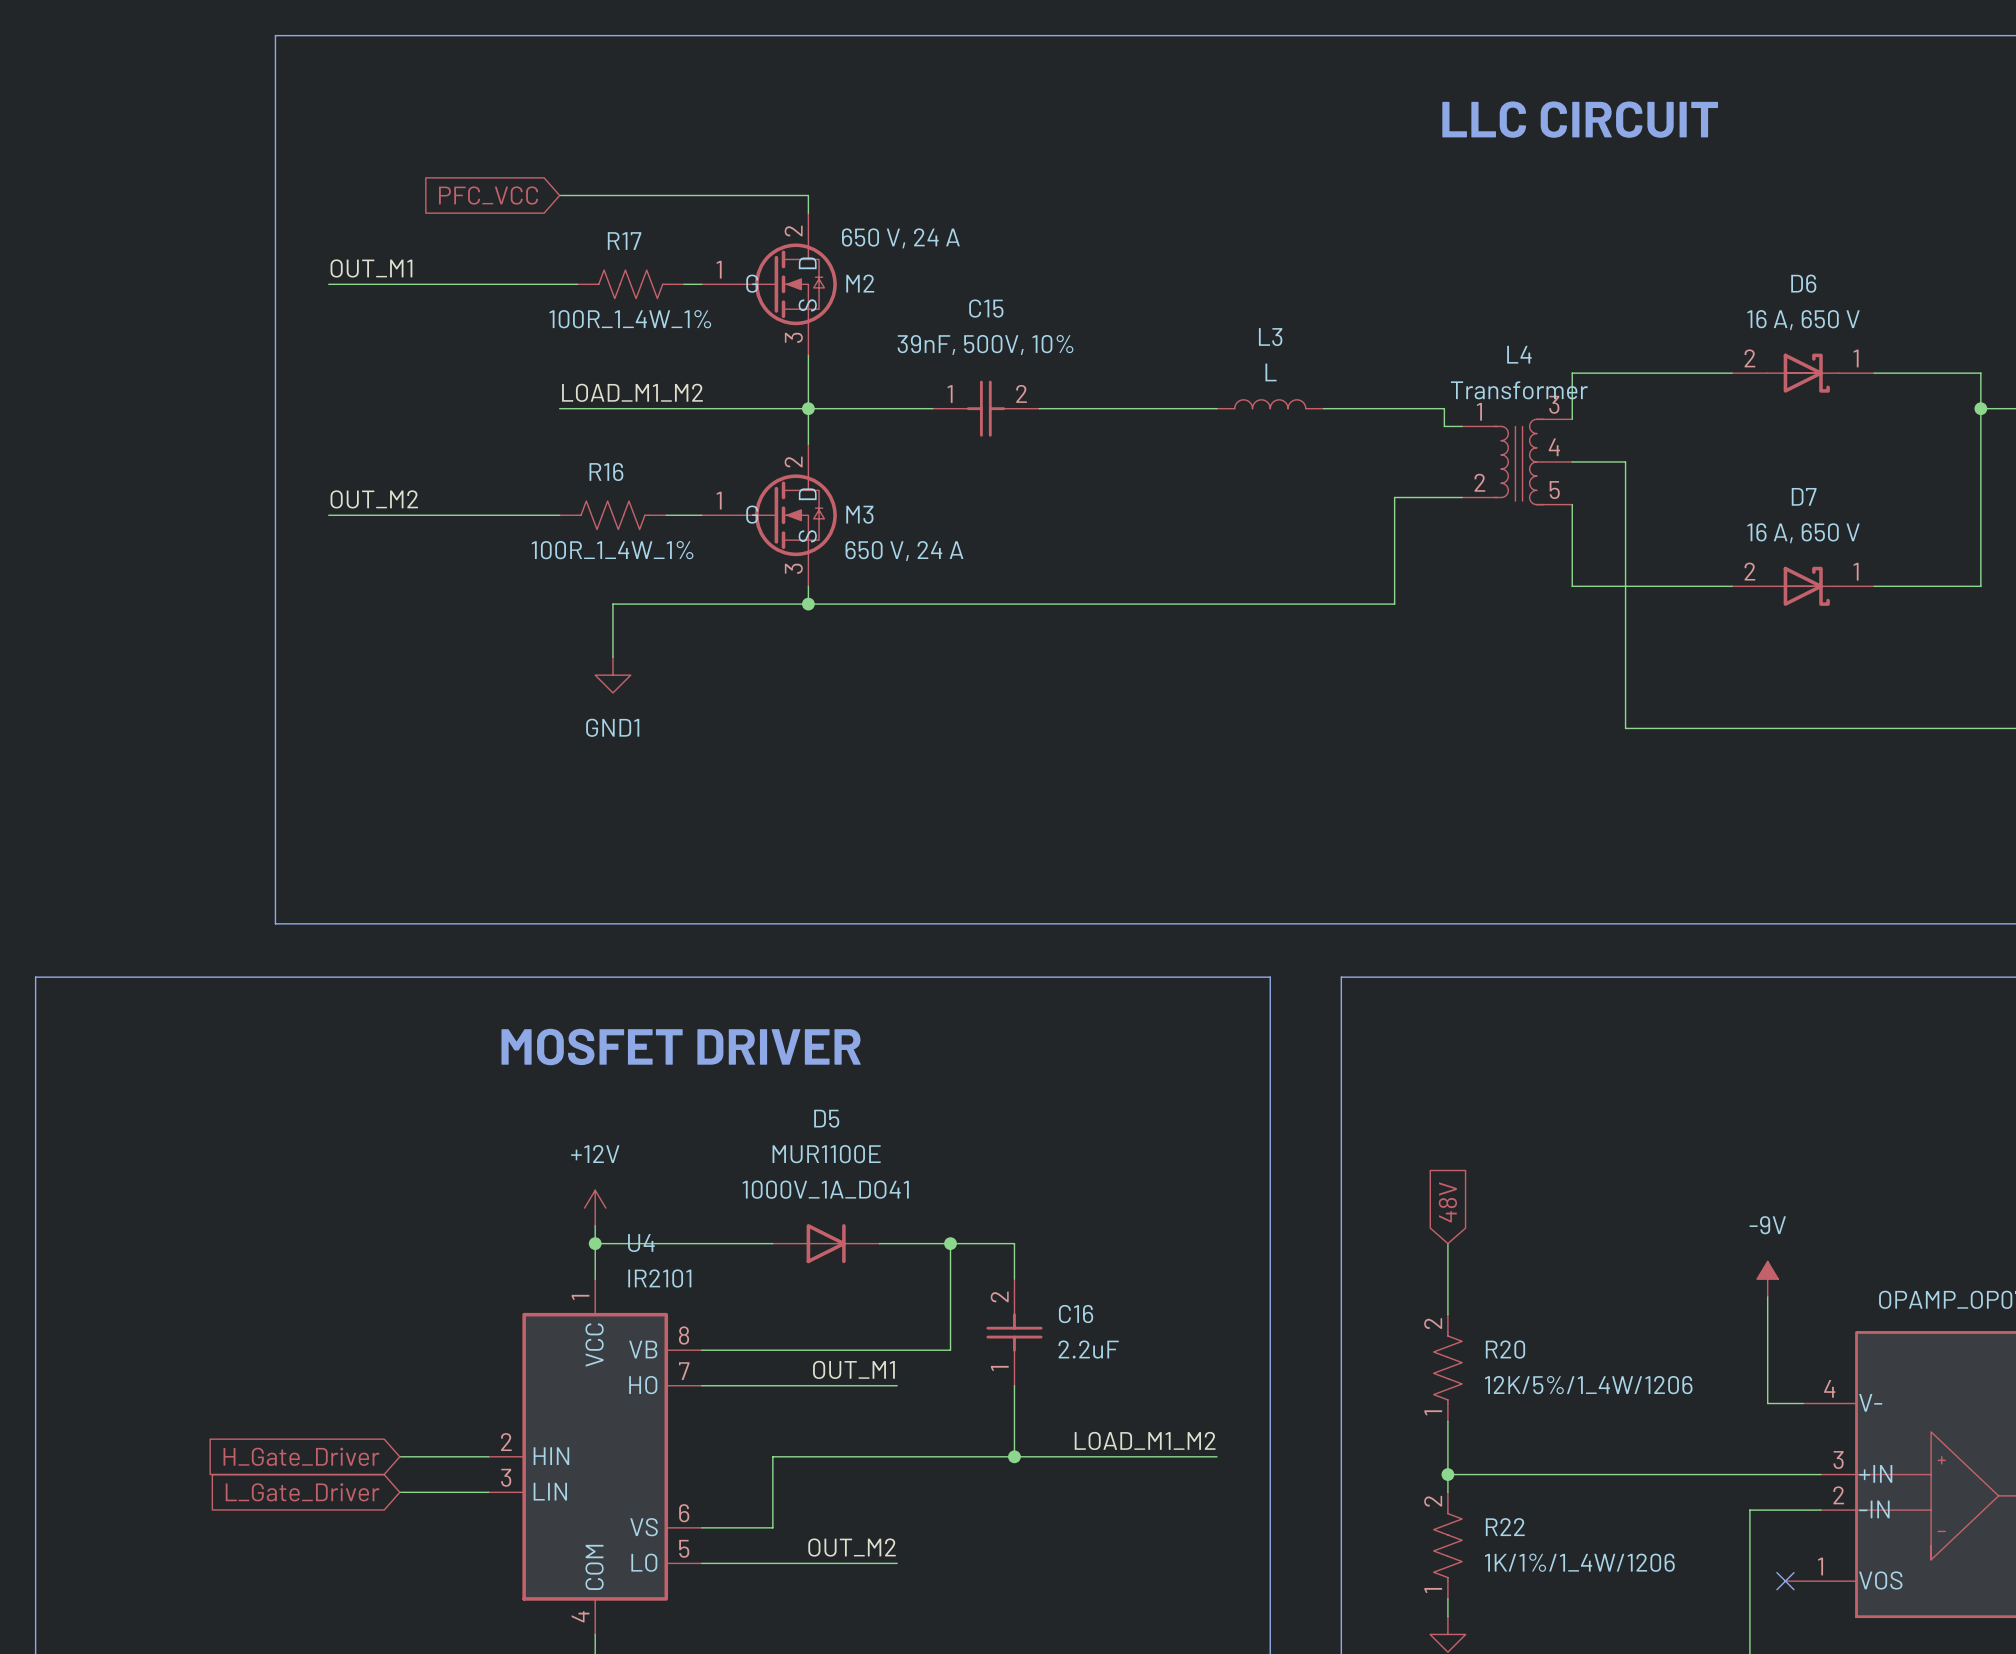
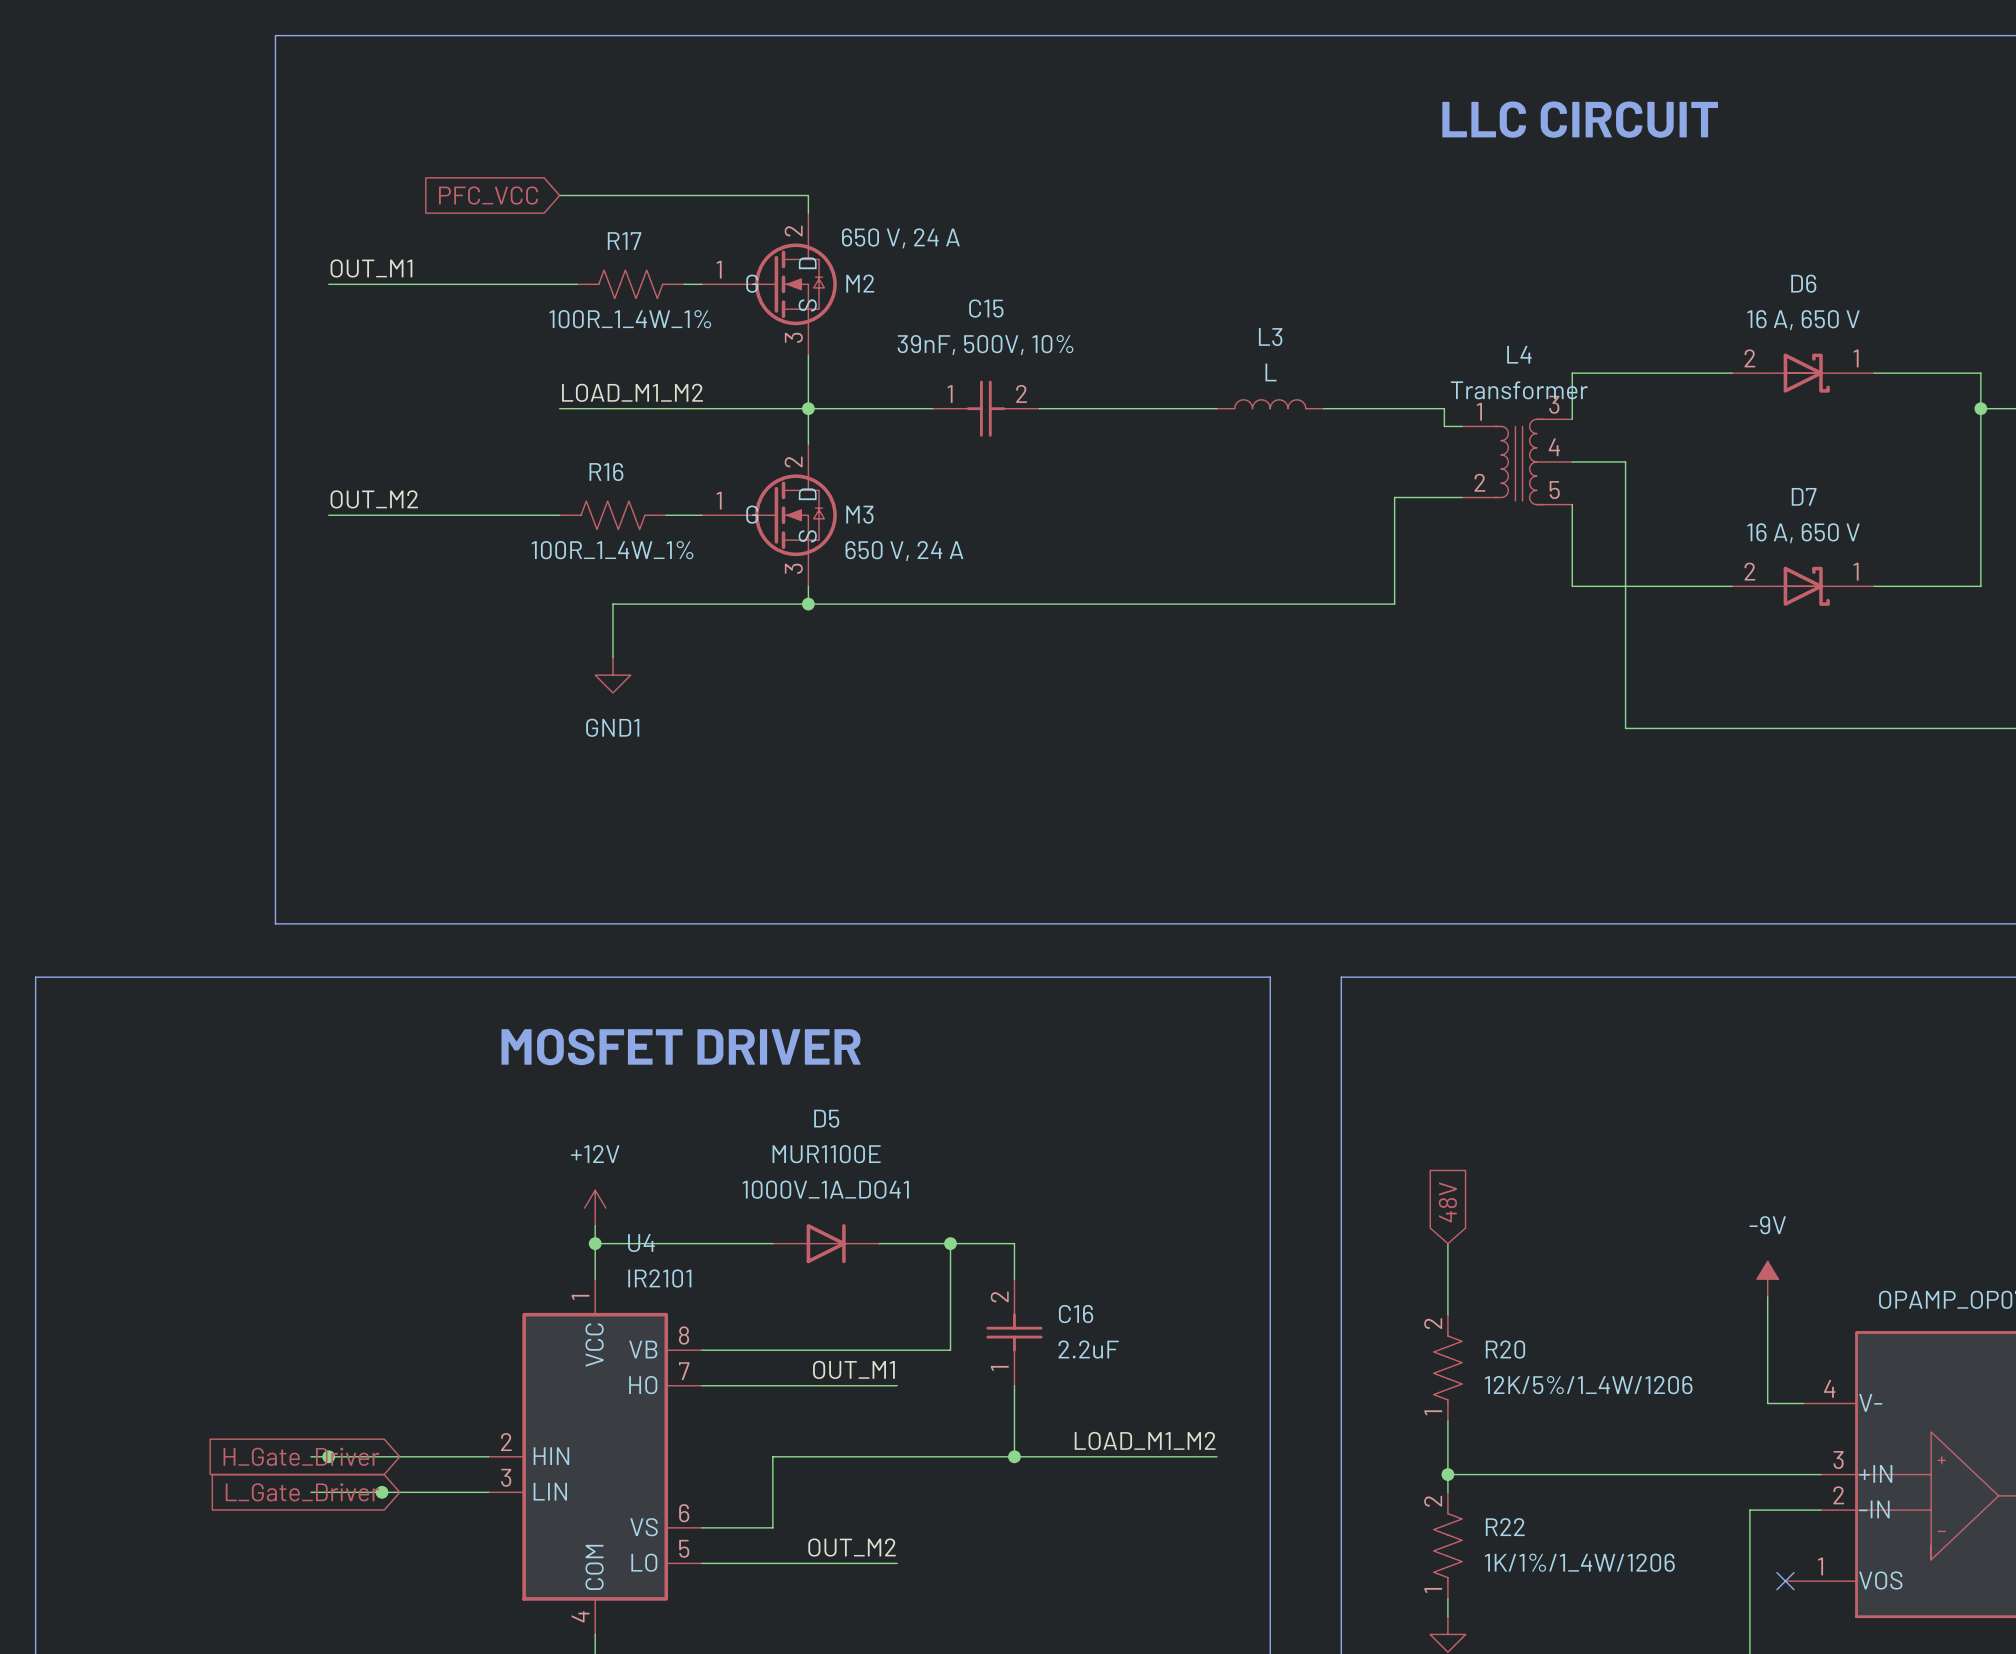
wire: none -> (310, 1456) (399, 1456)
junction: none -> (328, 1456)
wire: none -> (310, 1492) (399, 1492)
junction: none -> (382, 1492)

